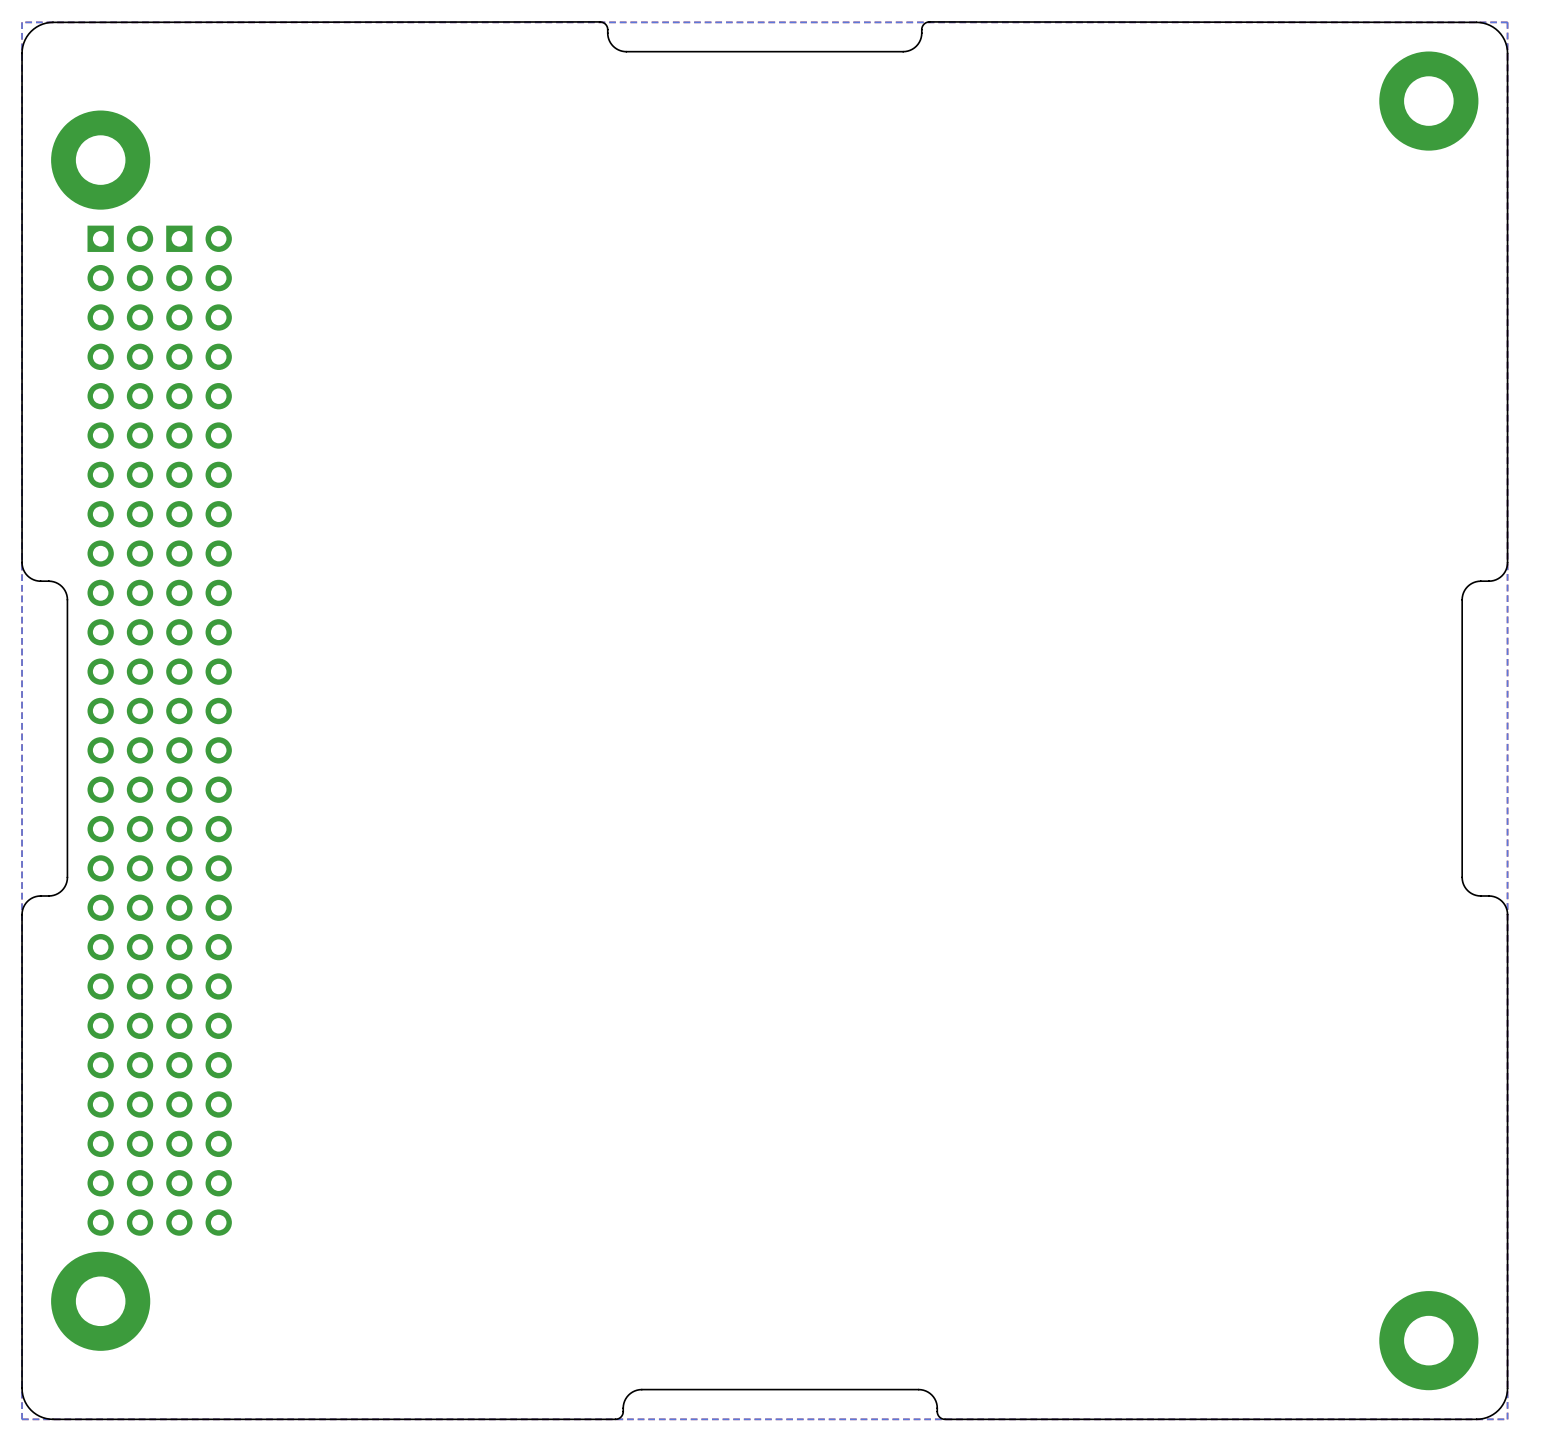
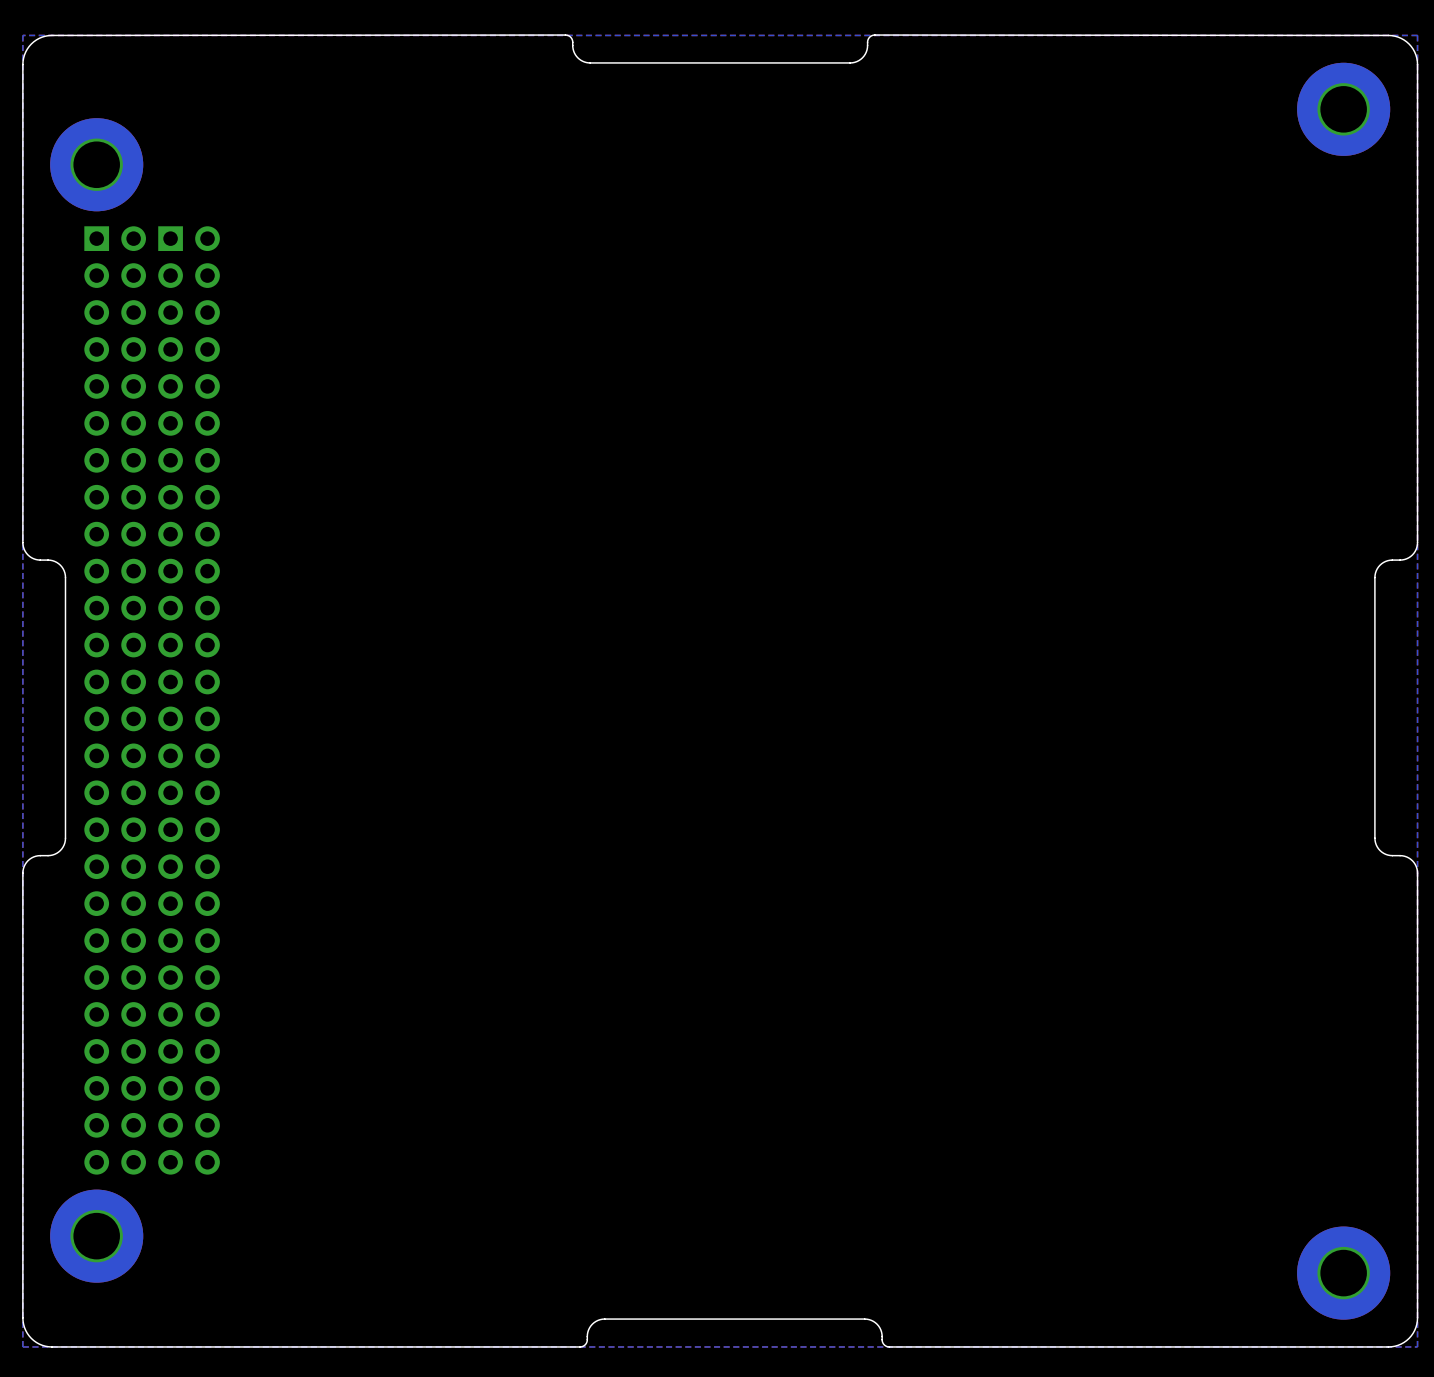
part footprint: [1379, 51, 1479, 151] -> [1297, 62, 1391, 156]
part footprint: [51, 110, 151, 210] -> [50, 118, 144, 212]
part footprint: [51, 1251, 151, 1351] -> [50, 1189, 144, 1283]
part footprint: [1379, 1291, 1479, 1391] -> [1297, 1226, 1391, 1320]

